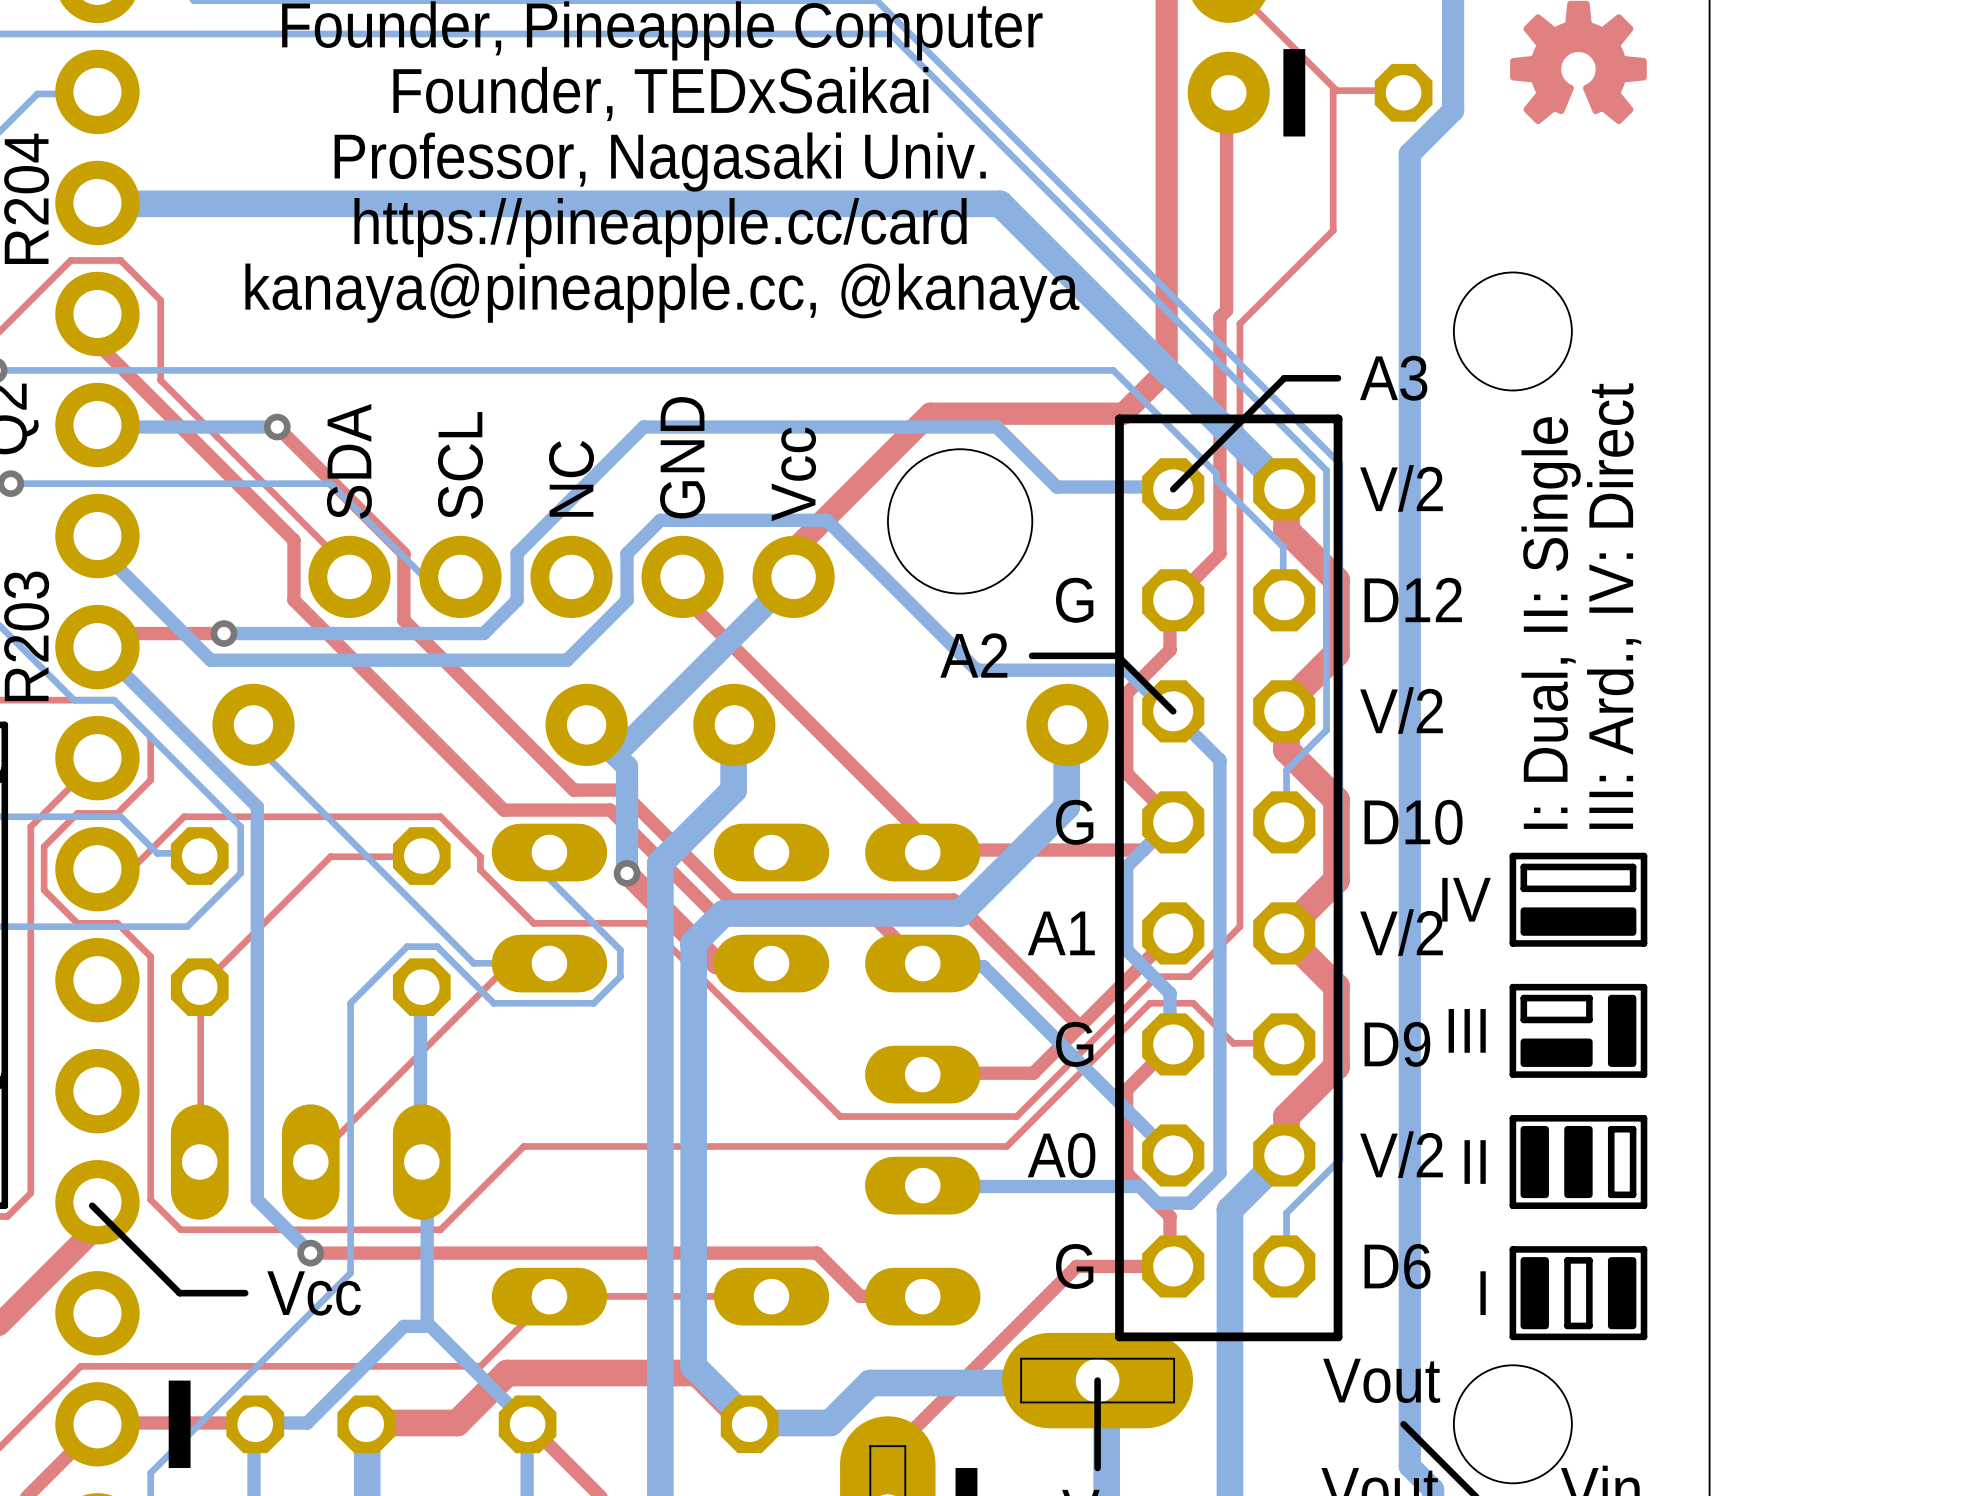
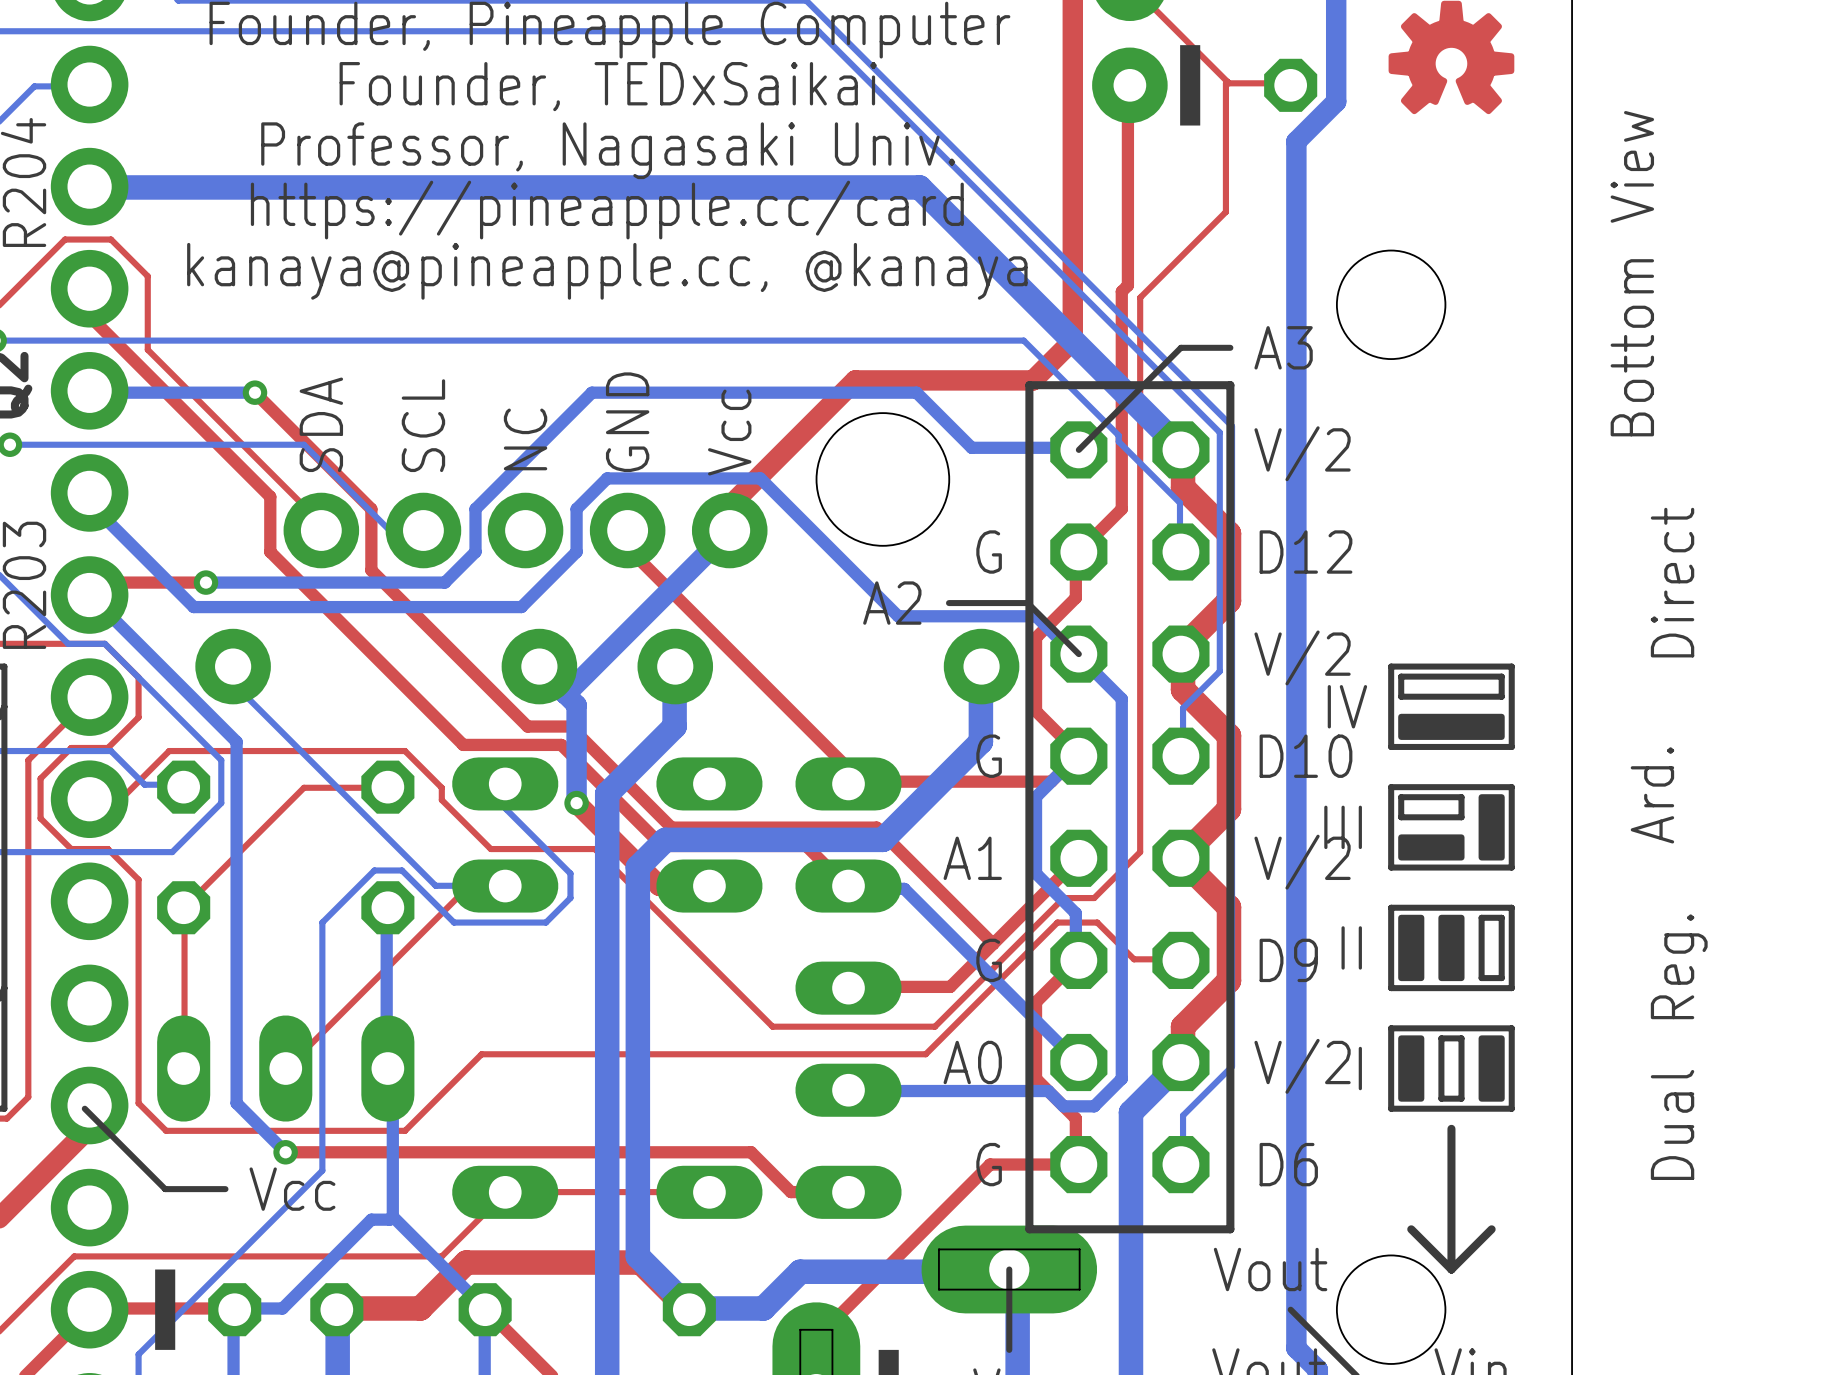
text: none -> Bottom View (1632, 273)
text: III: Ard., IV: Direct (1614, 606) -> none
text: I: Dual, II: Single (1551, 623) -> none
text: none -> Direct (1672, 582)
line: none -> (1501, 676) (1501, 696) (1401, 696) (1401, 676) (1501, 676)
text: none -> IV (1347, 706)
drawing: none -> [1478, 794, 1505, 861]
line: (1589, 866) (1633, 866) (1633, 888) (1589, 888) -> (1461, 797) (1461, 817)
text: none -> Ard. (1652, 795)
text: IV (1466, 899) -> III (1343, 827)
drawing position: (1578, 921) -> (1451, 726)
drawing: none -> [1398, 914, 1465, 982]
drawing: [1607, 994, 1637, 1067] -> none
line: (1589, 998) (1523, 998) (1523, 1019) (1589, 1019) (1589, 998) -> none
text: III (1467, 1030) -> II (1351, 947)
drawing position: (1556, 1052) -> (1431, 847)
text: none -> Reg. (1679, 966)
line: (1633, 1129) (1633, 1194) (1611, 1194) (1611, 1129) (1633, 1129) -> (1501, 917) (1501, 978) (1481, 978) (1481, 917) (1501, 917)
text: II (1475, 1162) -> I (1360, 1068)
drawing position: (1578, 1162) -> (1491, 1068)
line: none -> (1451, 1128) (1451, 1269)
text: none -> Dual (1672, 1124)
line: (1644, 1249) (1644, 1336) (1512, 1336) (1512, 1249) (1644, 1249) -> (1511, 666) (1511, 746) (1391, 746) (1391, 666) (1511, 666)
drawing: [1520, 1257, 1549, 1330] -> none
drawing: [1607, 1257, 1637, 1330] -> none
line: (1589, 1260) (1589, 1325) (1567, 1325) (1567, 1260) (1589, 1260) -> (1461, 1038) (1461, 1098) (1441, 1098) (1441, 1038) (1461, 1038)
text: I (1483, 1293) -> none
line: none -> (1411, 1229) (1451, 1269)
line: none -> (1491, 1229) (1451, 1269)

